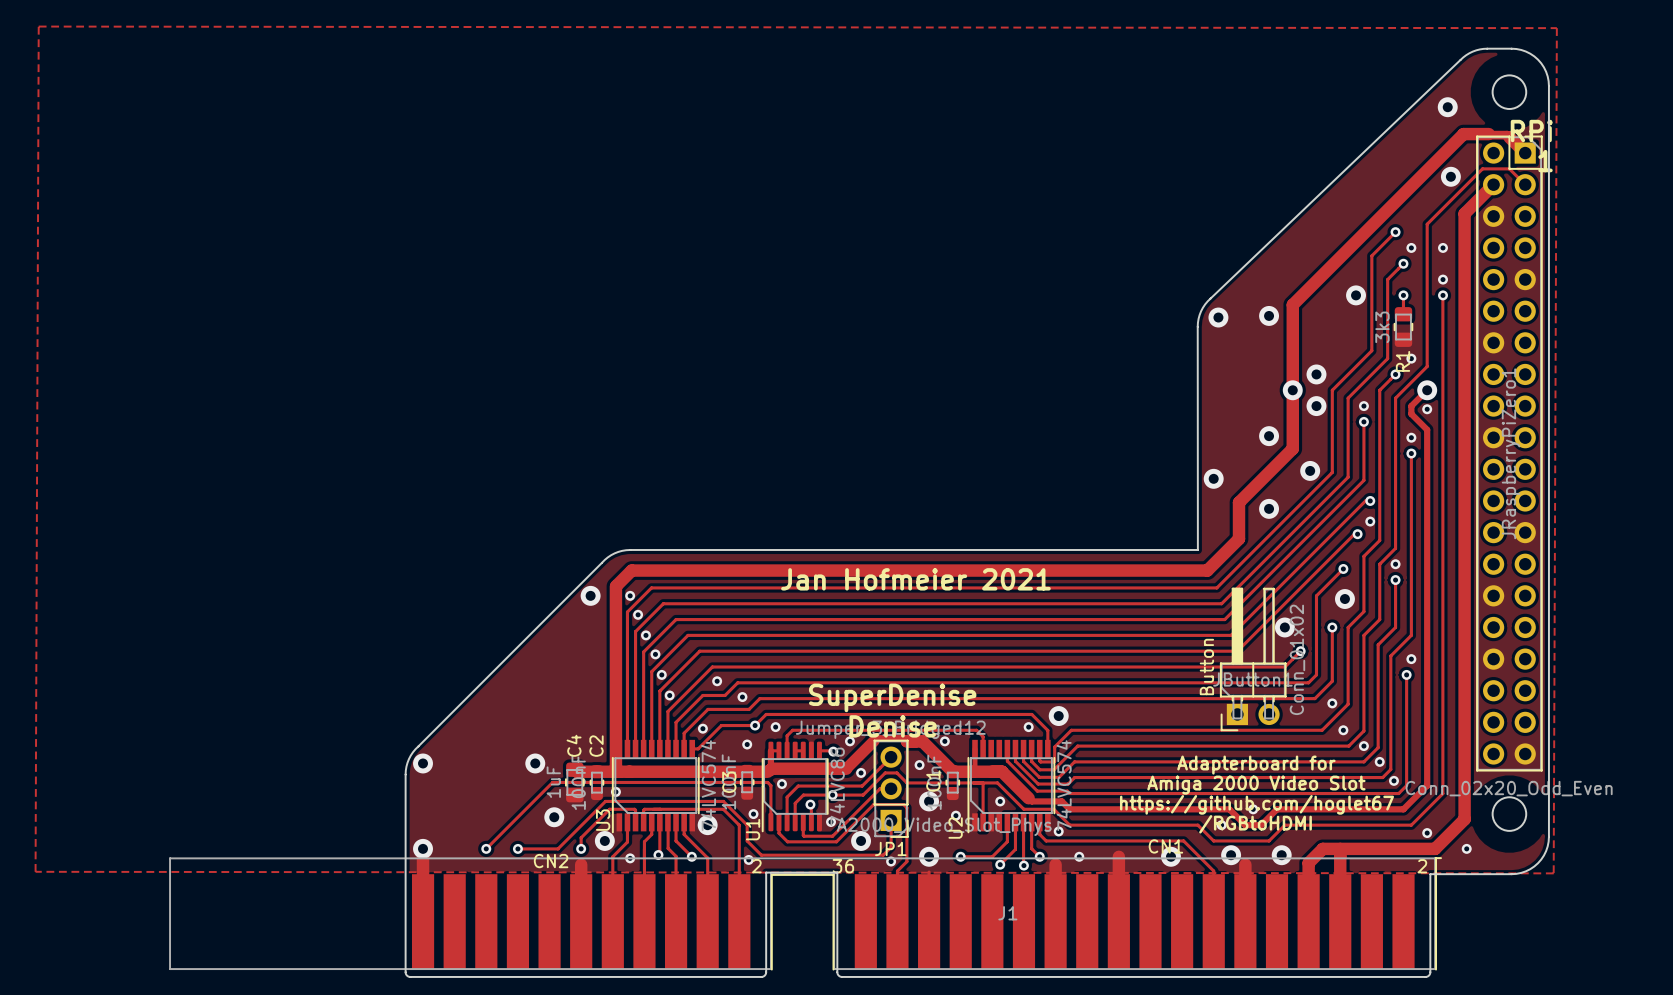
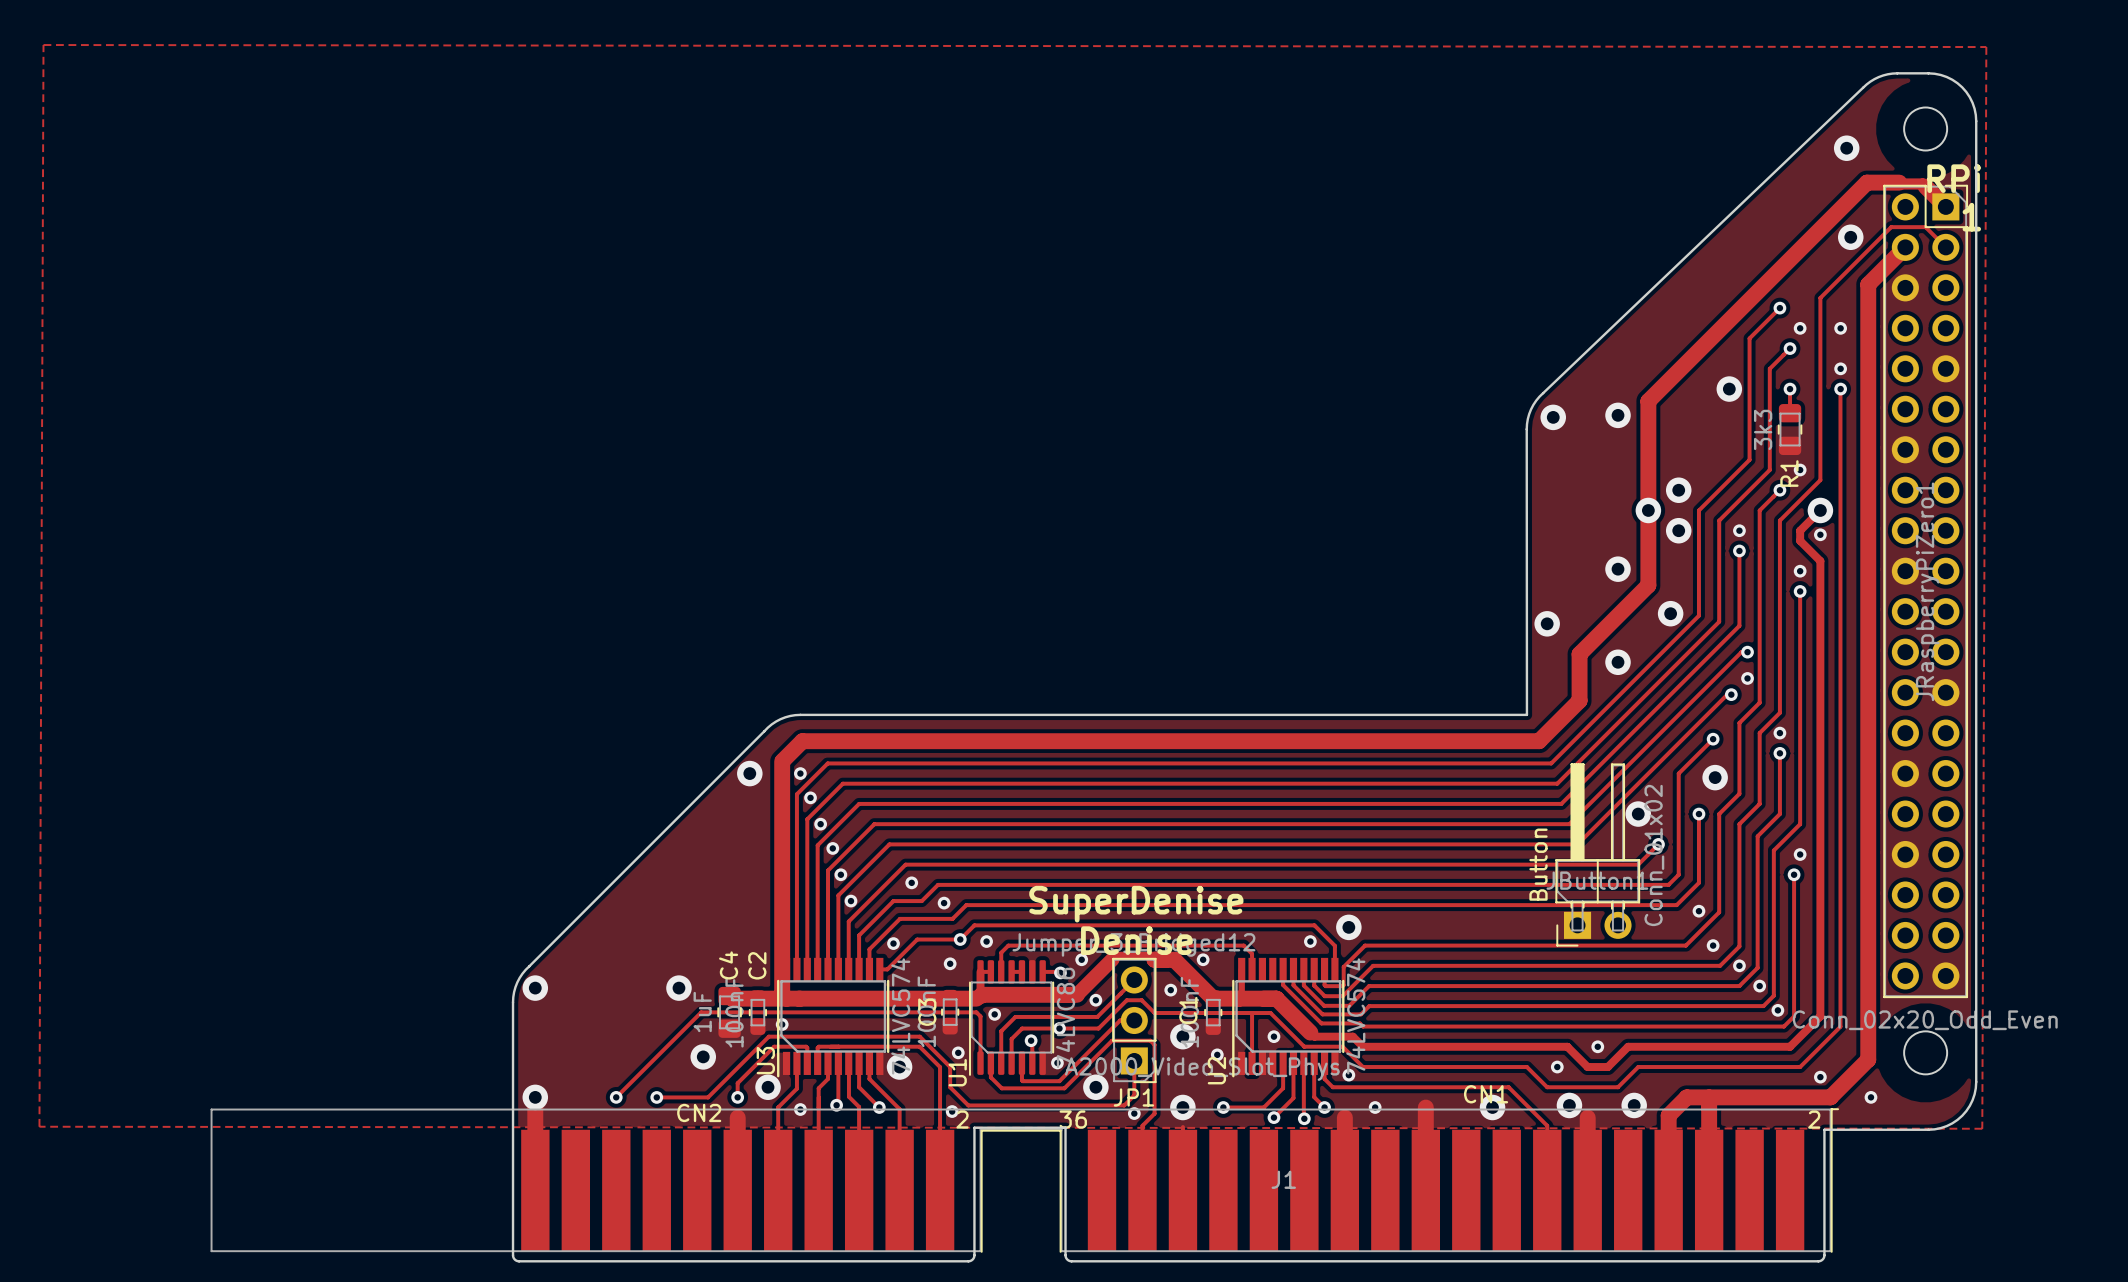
text: Jan Hofmeier 2021 (915, 579) -> none
text: Adapterboard for (1256, 765) -> none
text: Amiga 2000 Video Slot (1256, 785) -> none
text: https://github.com/hoglet67 (1256, 804) -> none
text: /RGBtoHDMI (1255, 824) -> none

